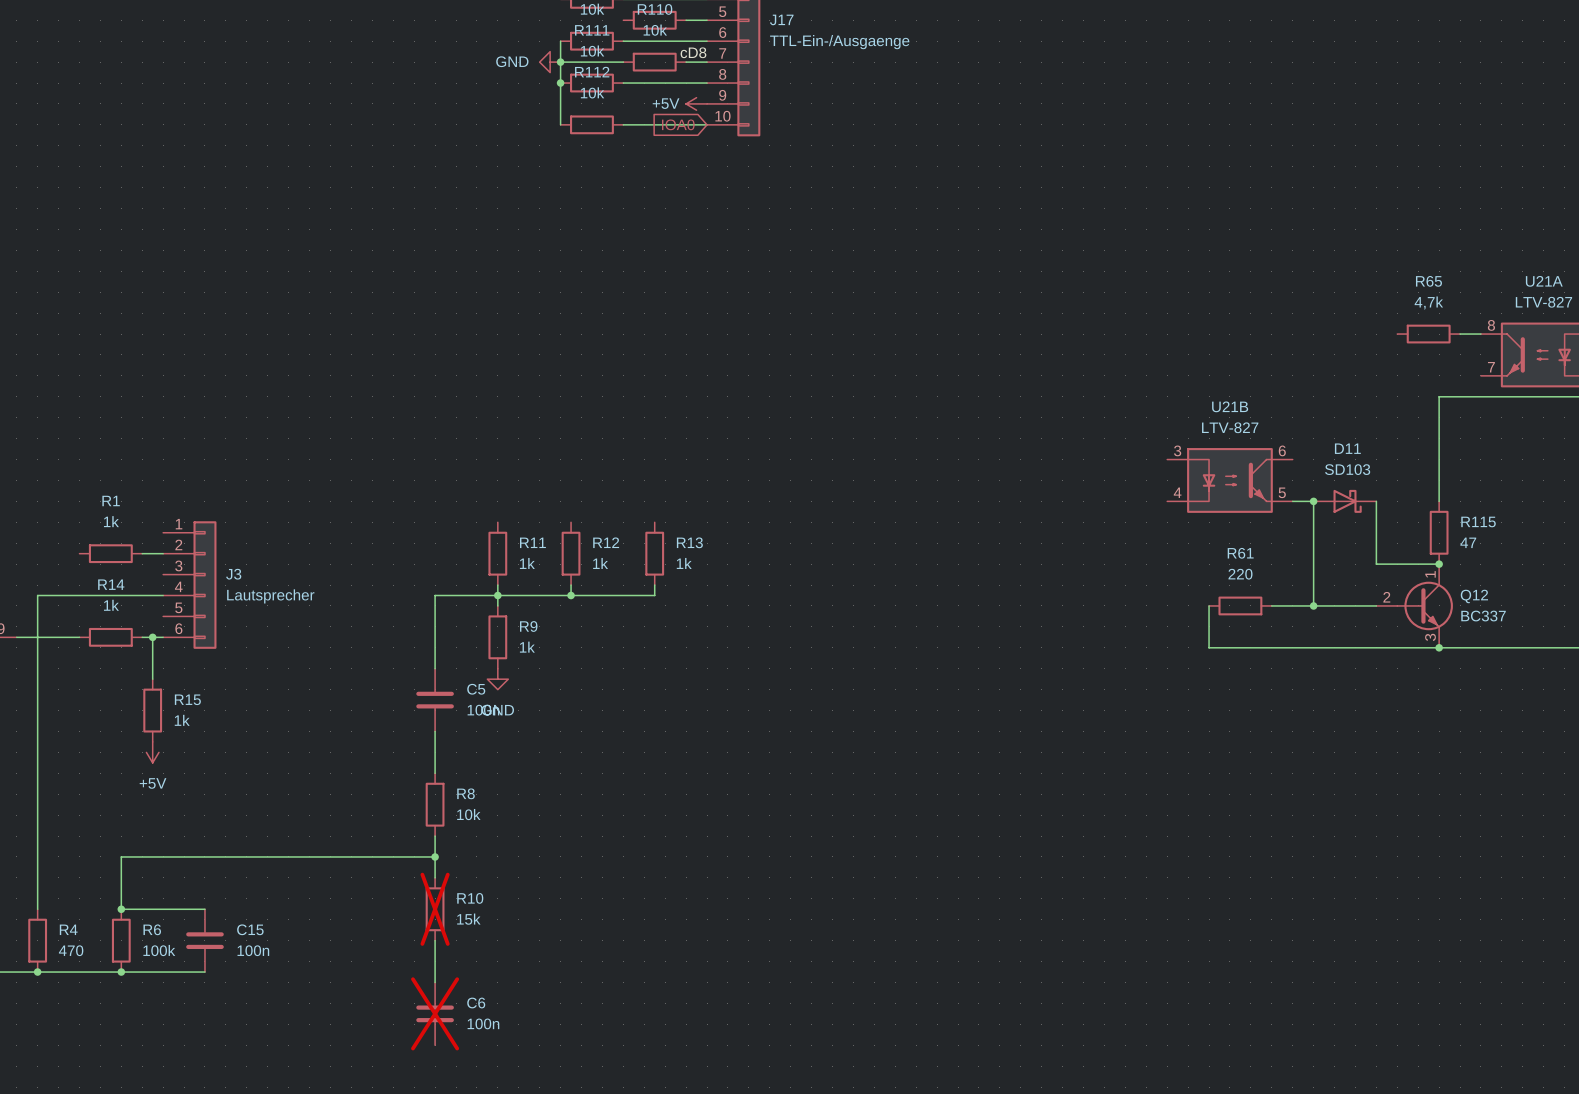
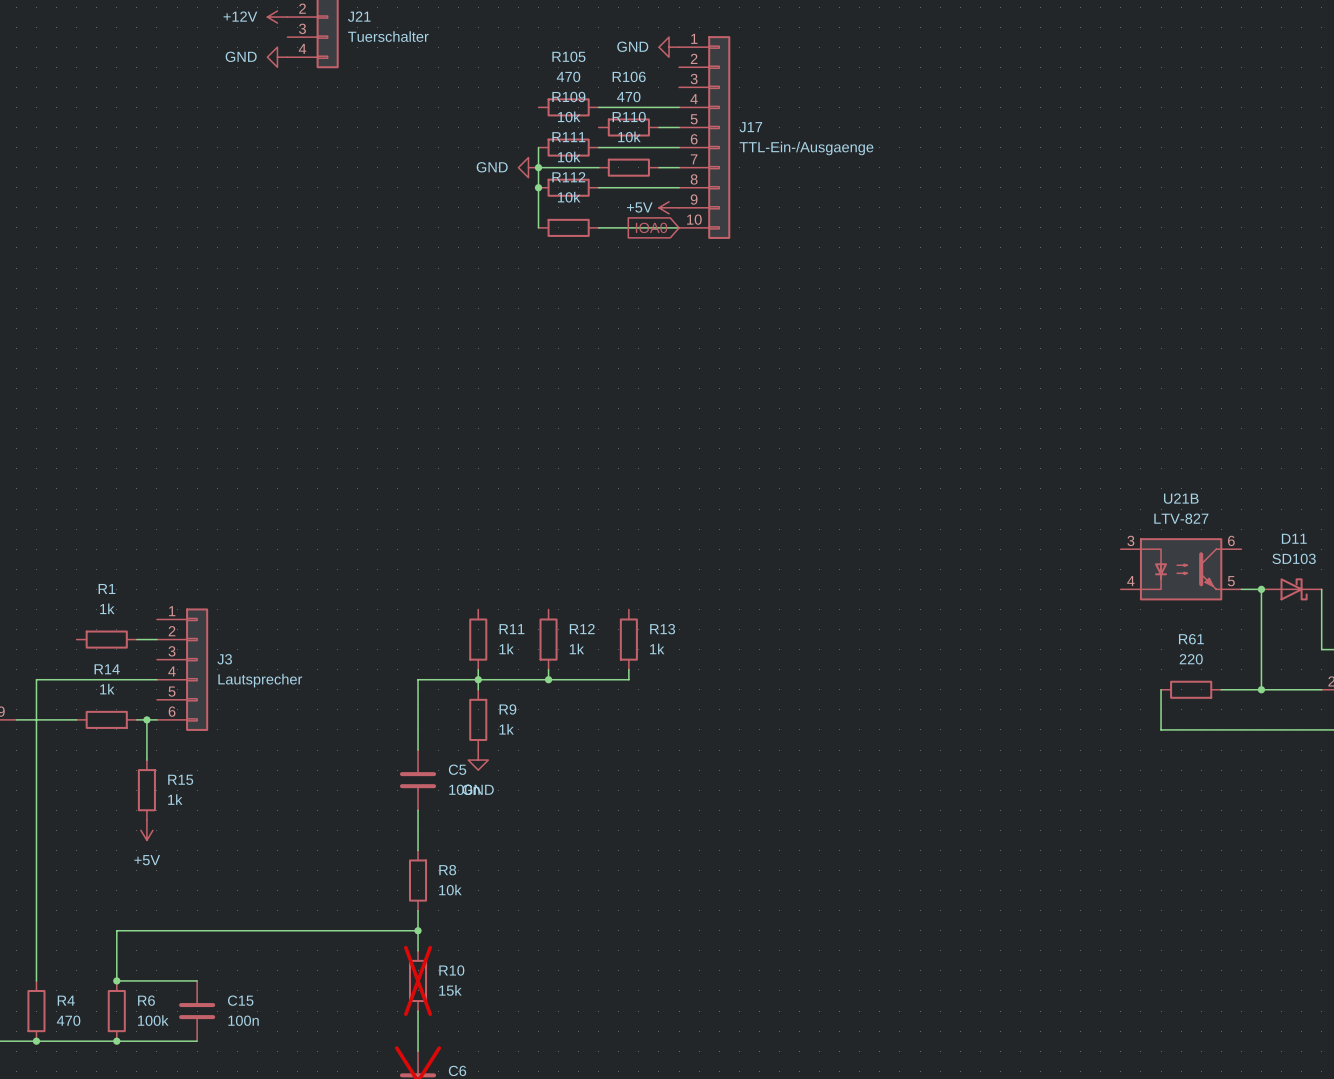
label: cD8 (693, 52) -> none

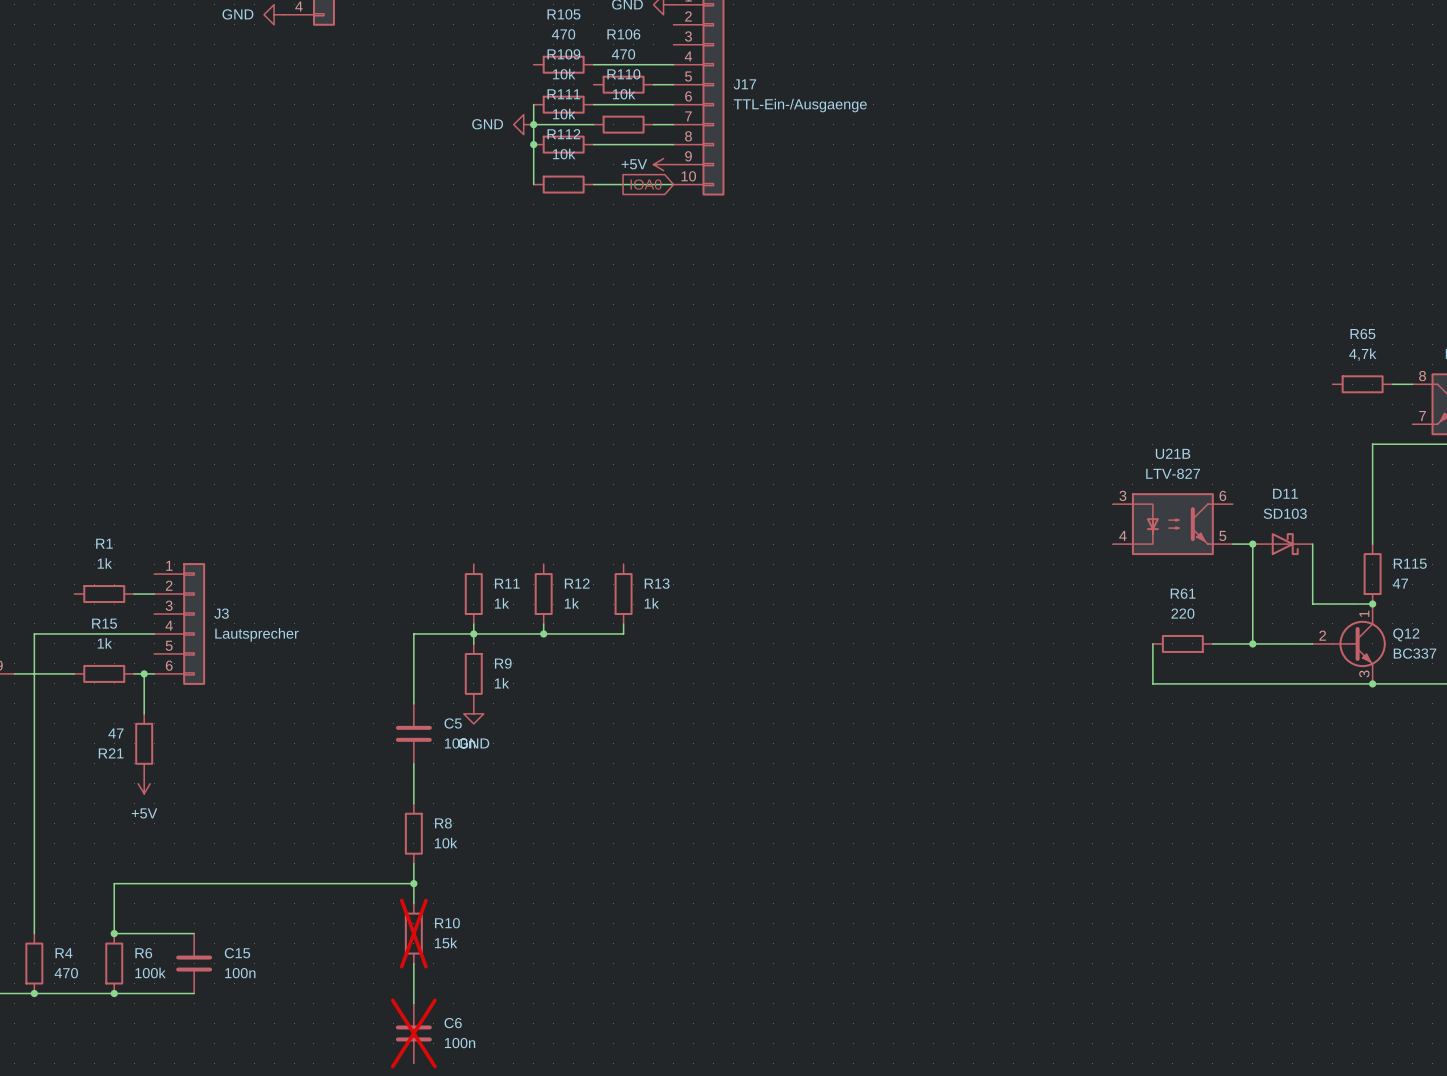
R14 name: R14 (107, 669) -> R15 (104, 623)
R15 name: R15 (180, 779) -> R21 (111, 753)
R15 value: 1k (175, 799) -> 47 (115, 733)

